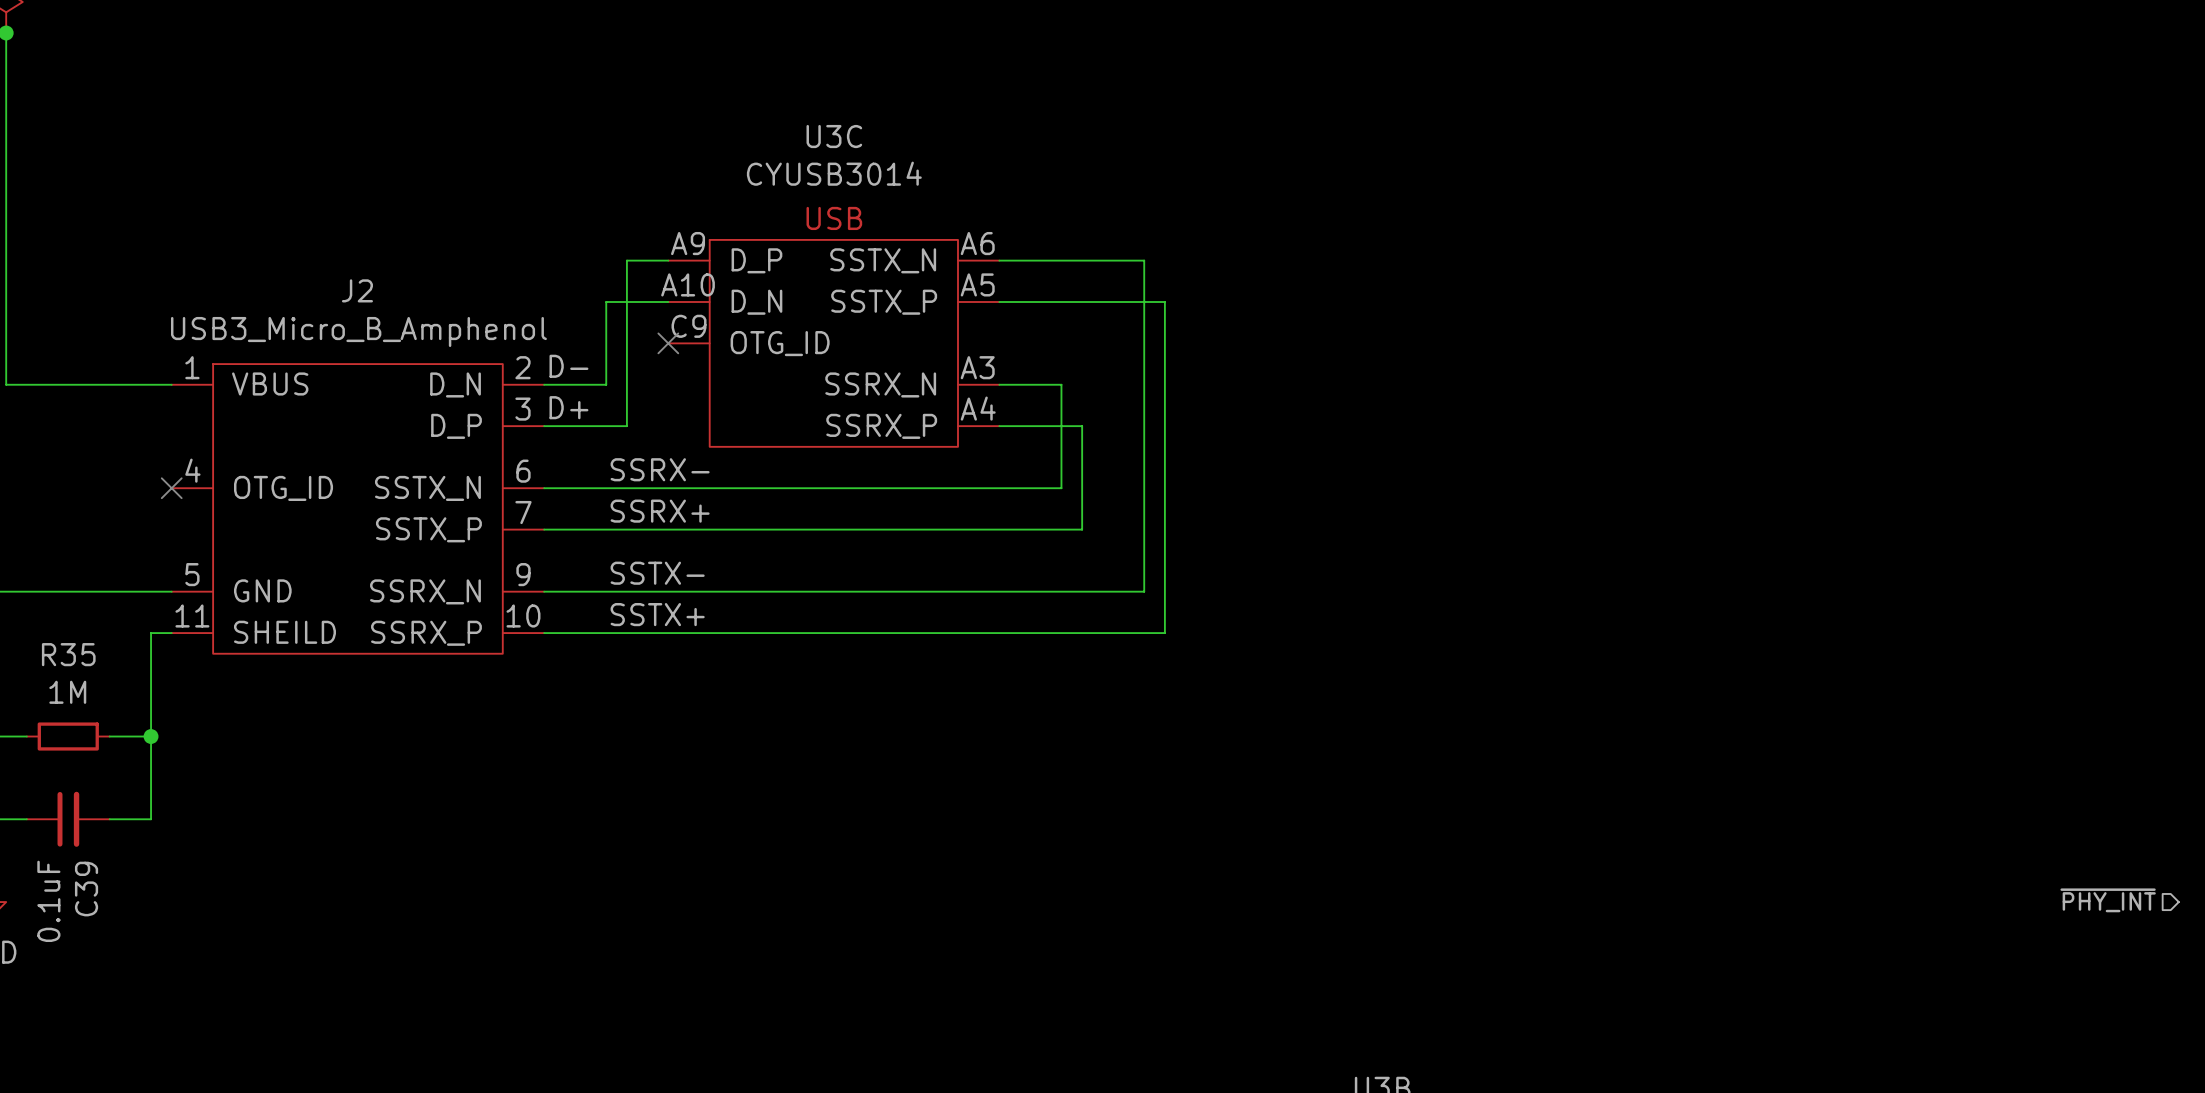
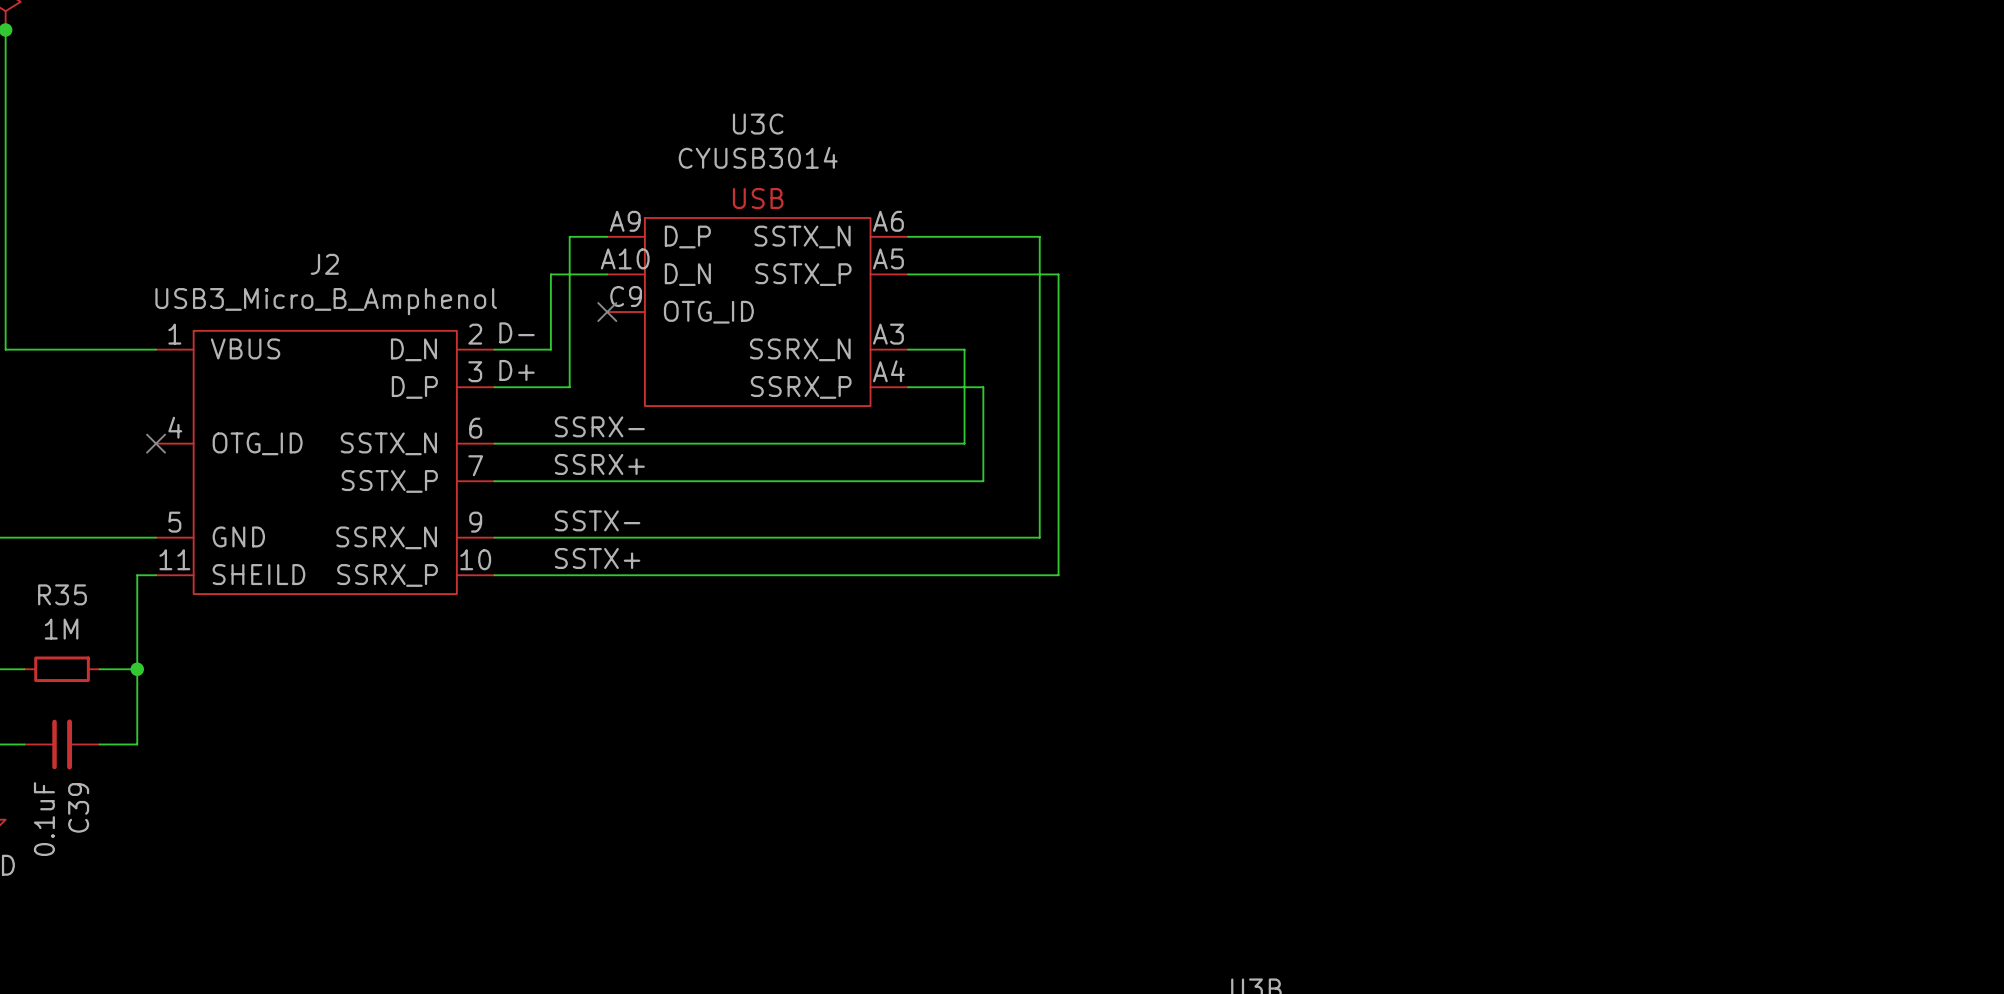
hierarchical label: ~{PHY_INT} (2108, 900) -> none

